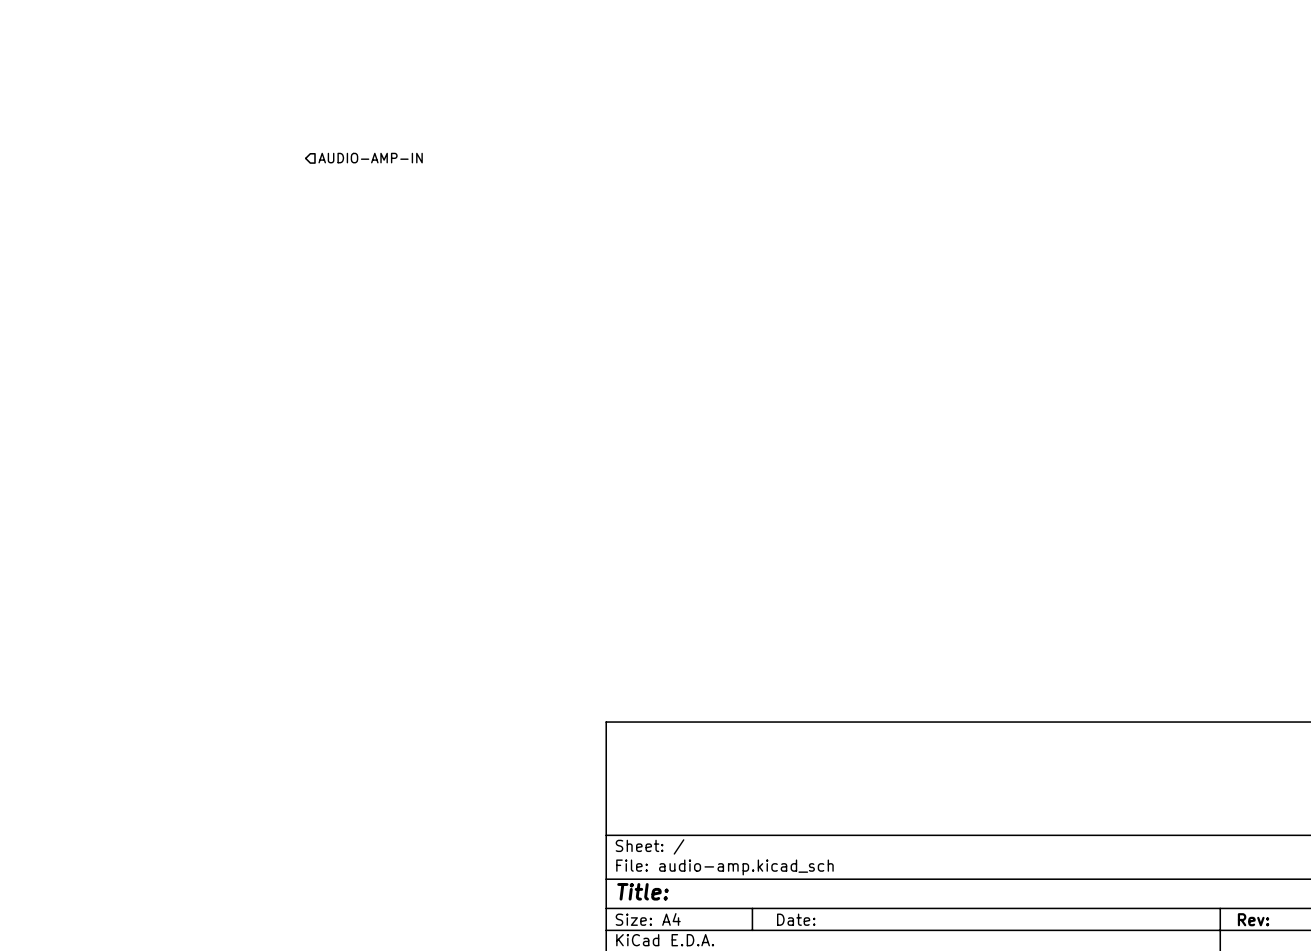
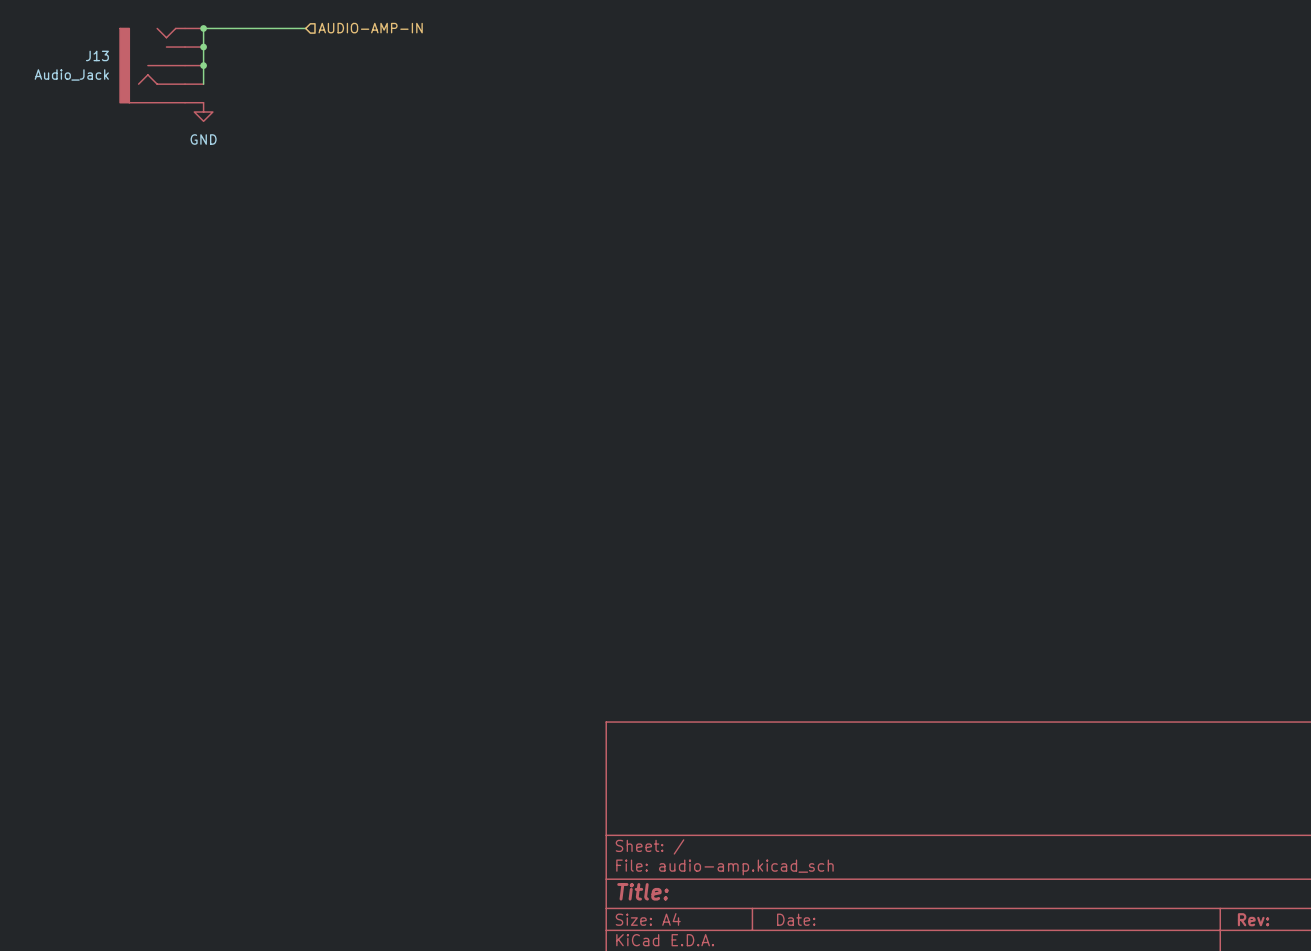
junction: none -> (203, 28)
wire: none -> (305, 28) (203, 28) (203, 84)
junction: none -> (203, 47)
J13: none -> Audio_Jack (161, 65)
junction: none -> (203, 65)
power symbol: none -> GND (203, 112)
hierarchical label position: AUDIO-AMP-IN (370, 158) -> AUDIO-AMP-IN (370, 28)

